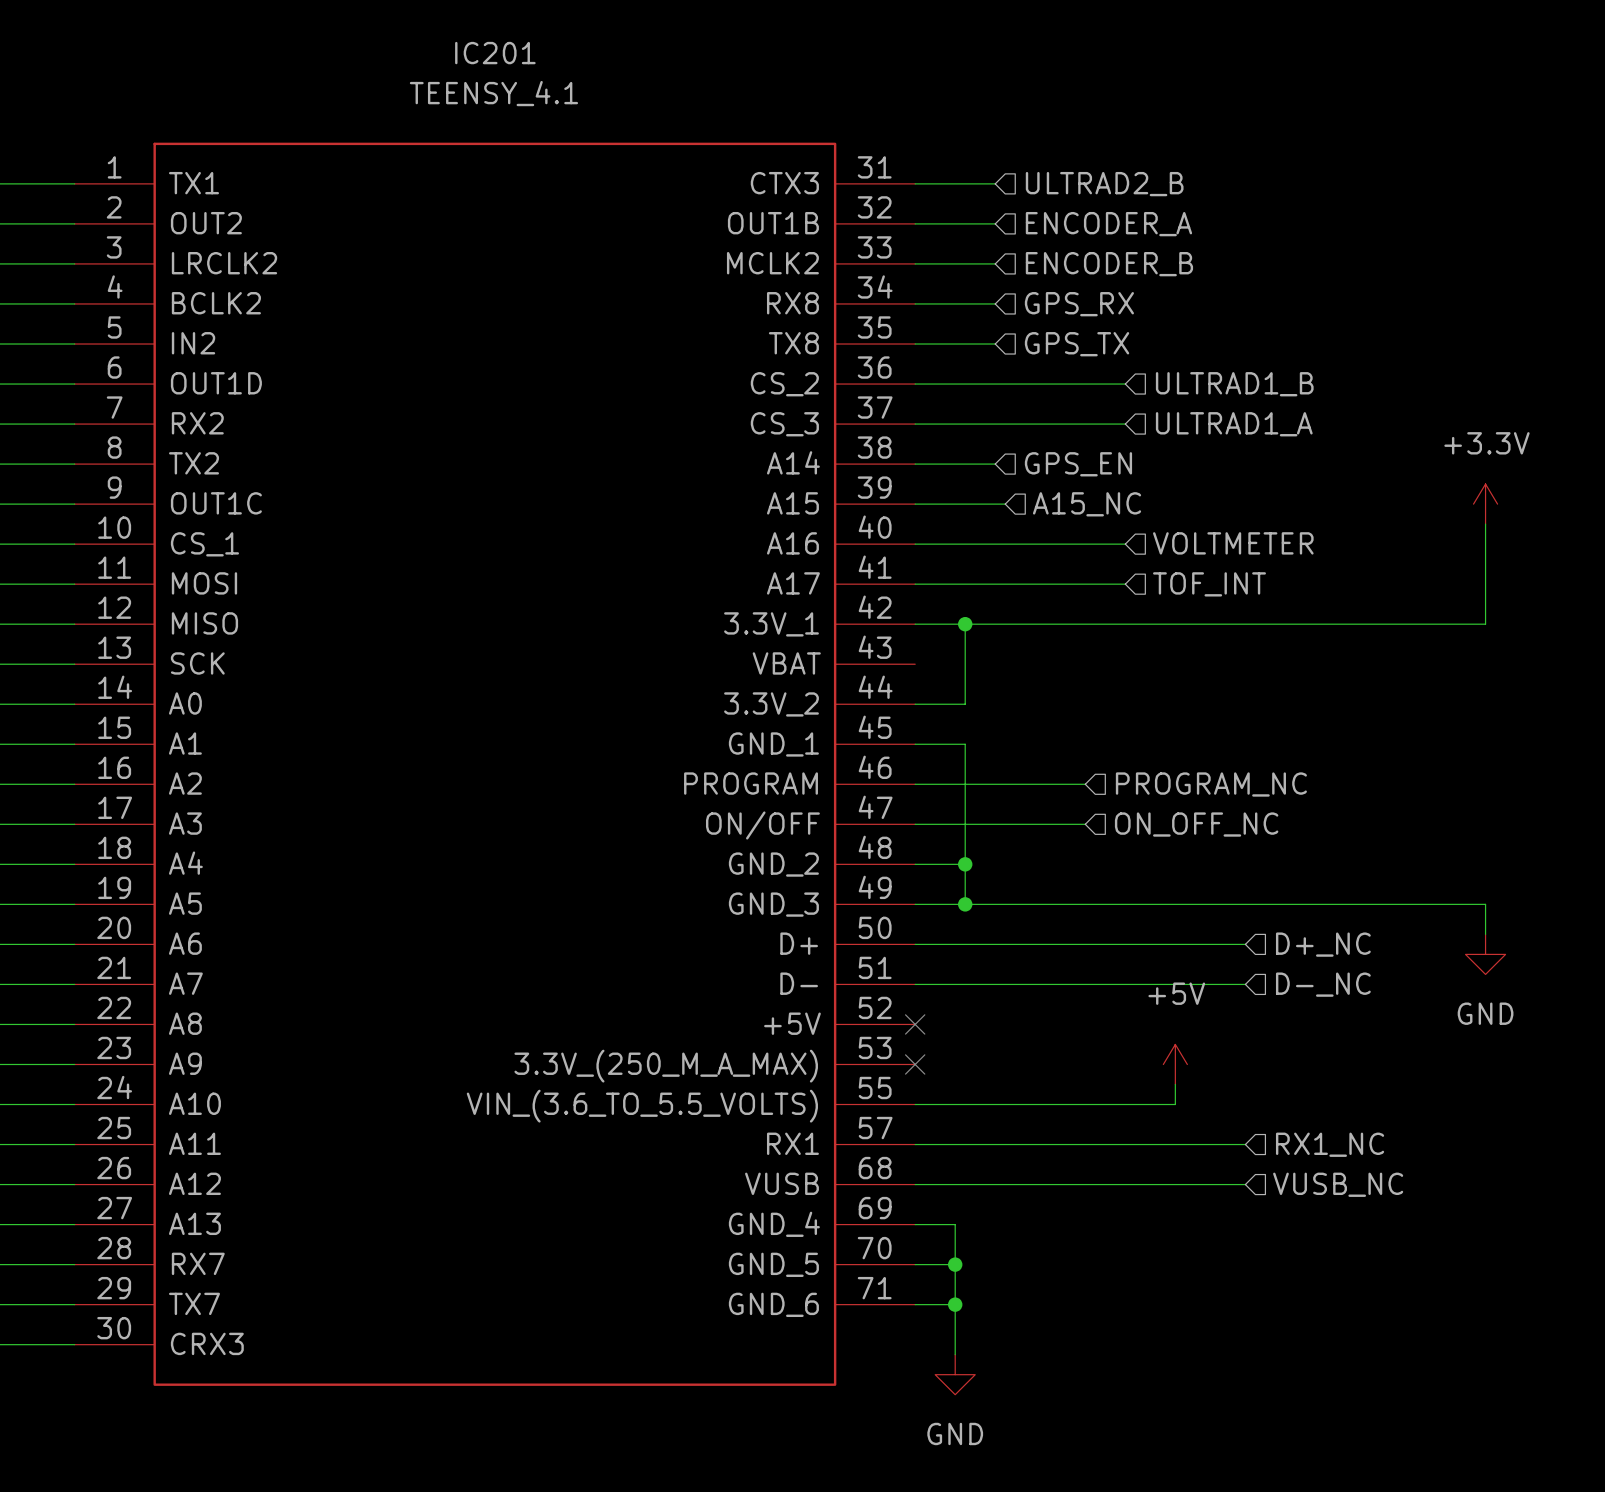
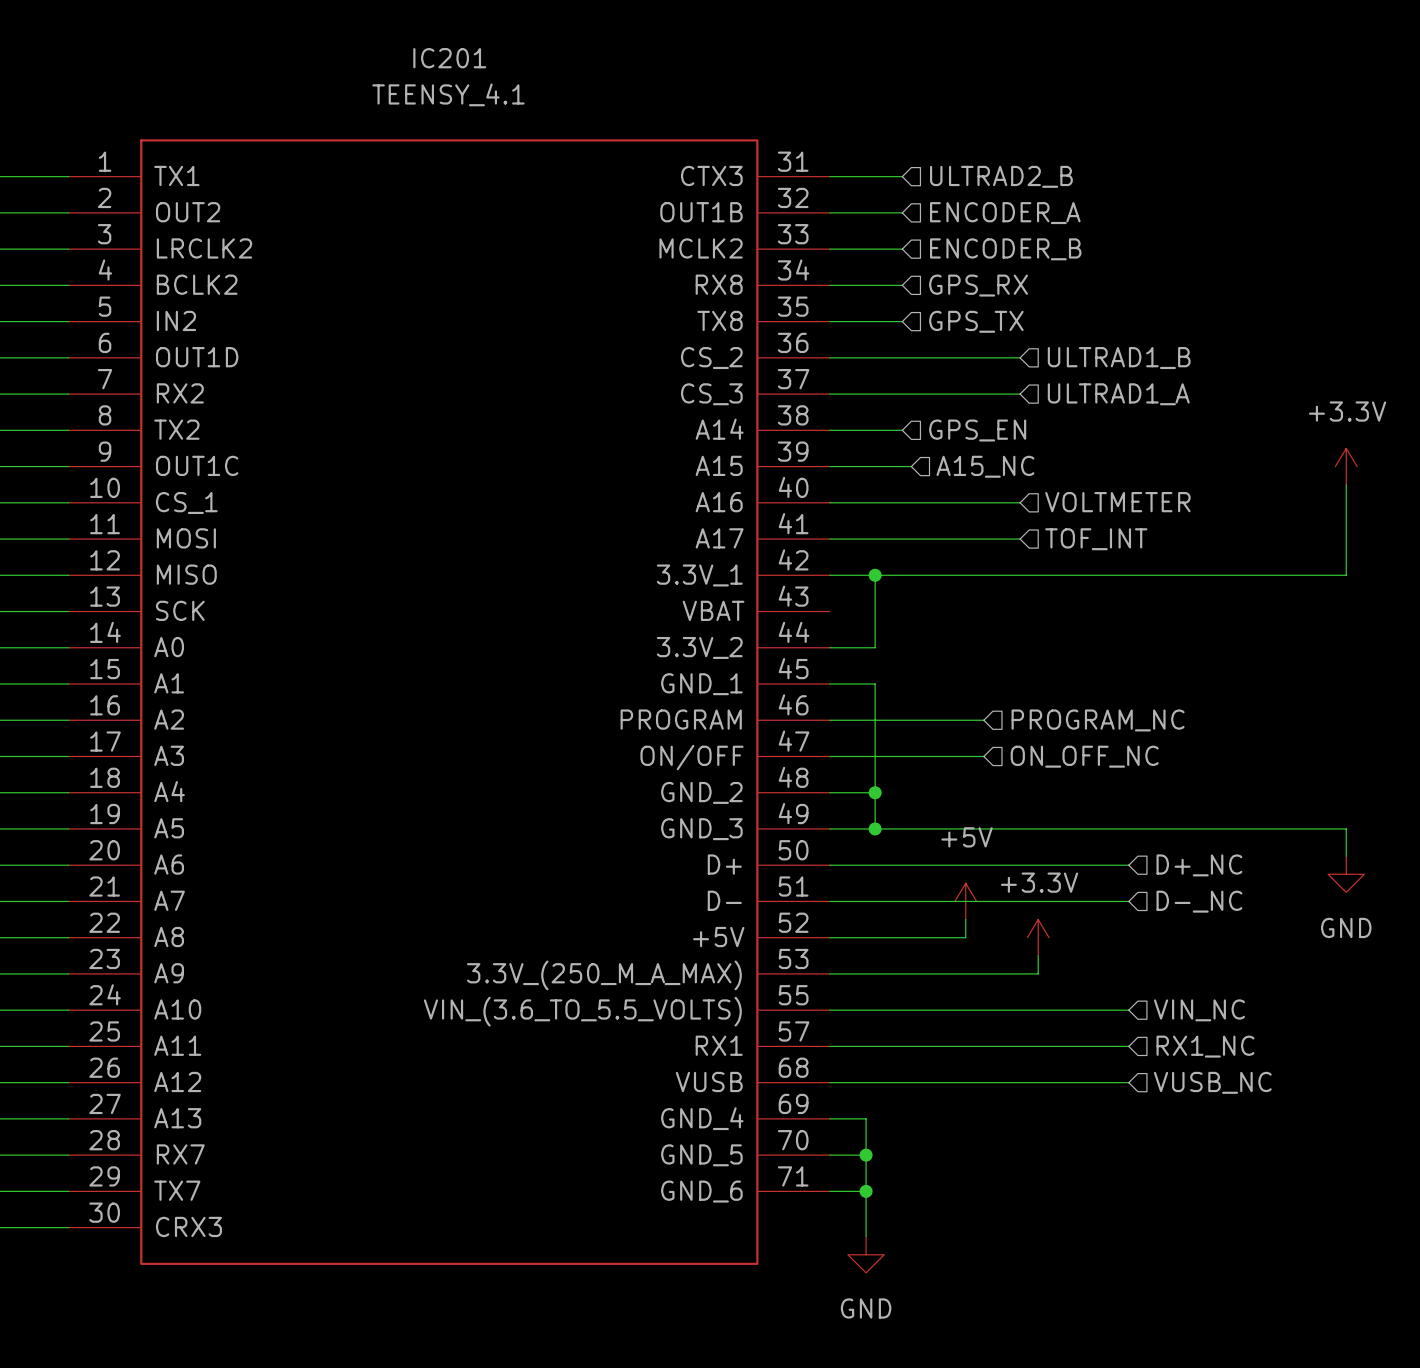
wire: none -> (965, 919) (965, 937) (829, 937)
no-connect mark: (915, 1024) -> none
power symbol: none -> +3.3V (1038, 937)
wire: none -> (1038, 955) (1038, 973) (829, 973)
no-connect mark: (915, 1064) -> none
power symbol position: +5V (1175, 1064) -> +5V (965, 901)
wire: (1175, 1084) (1175, 1104) -> (1128, 1010) (1065, 1010)
hierarchical label: none -> VIN_NC (1199, 1010)

